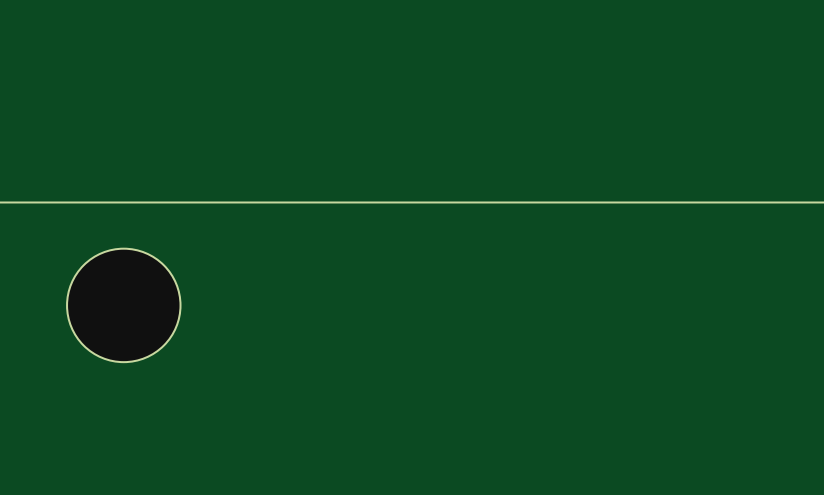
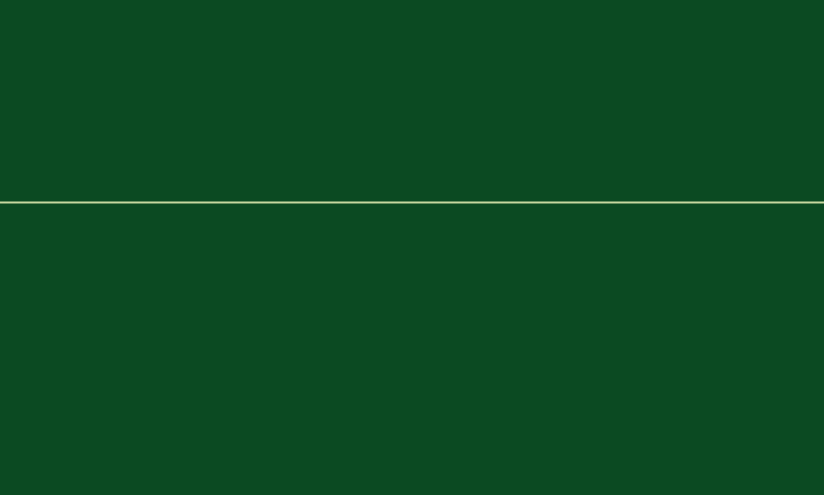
hole: (123, 305) -> none

